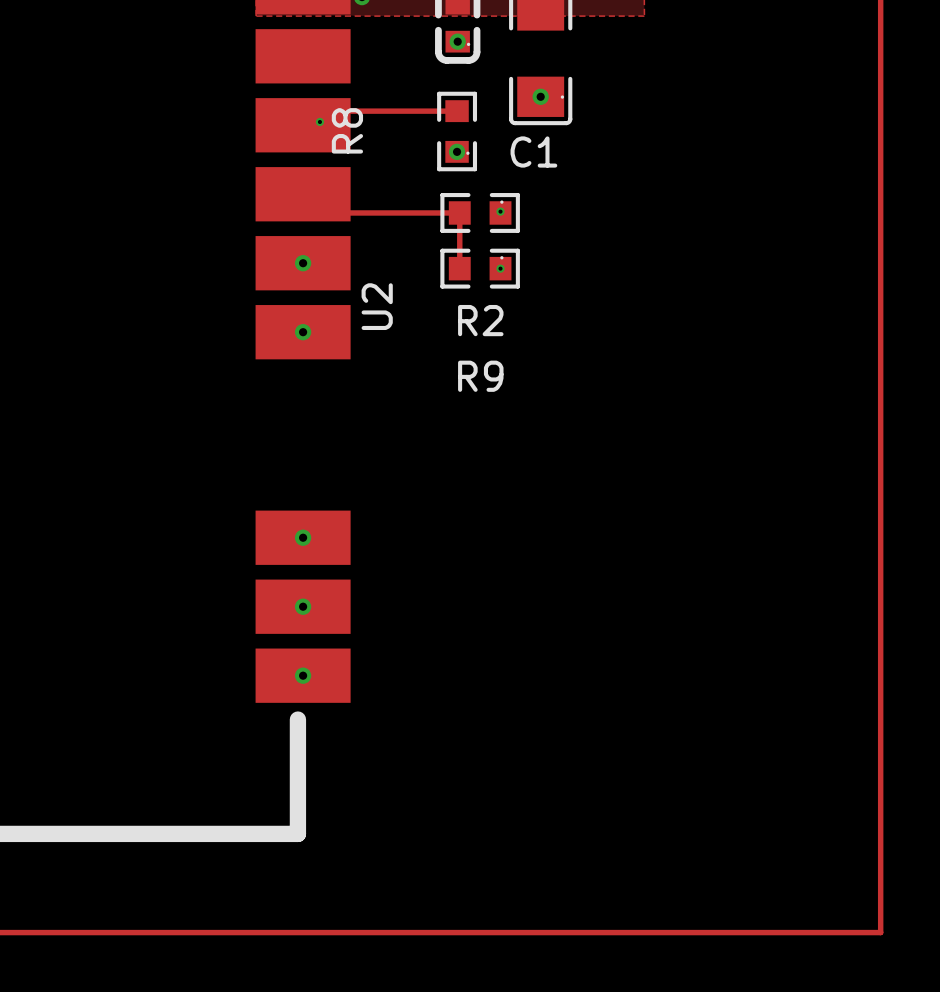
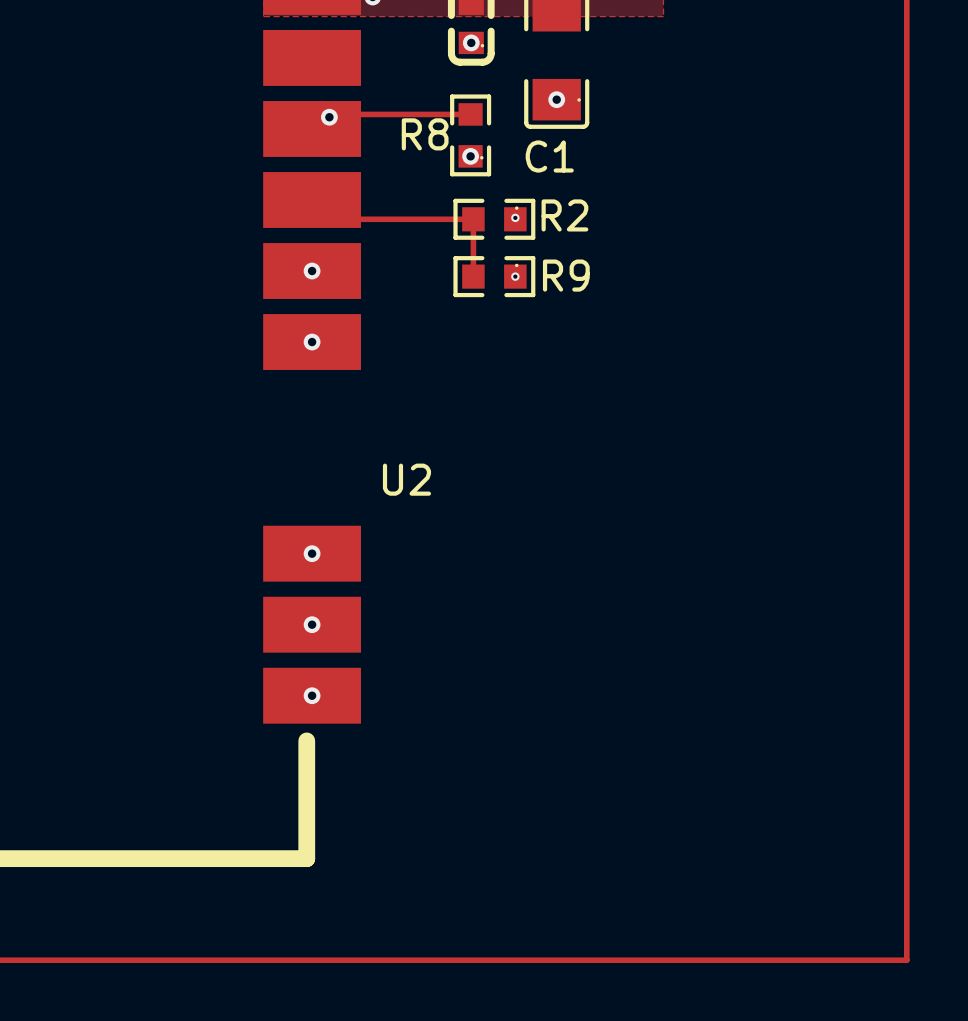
via size: [315, 117, 325, 127] -> [321, 108, 338, 126]
R8 name rotation: 0° (347, 130) -> 90° clockwise (425, 134)
U2 name rotation: 0° (377, 306) -> 90° clockwise (406, 479)
U2 name position: U2 (377, 306) -> U2 (406, 479)
R2 name position: R2 (480, 320) -> R2 (564, 215)
R9 name position: R9 (480, 376) -> R9 (566, 275)

